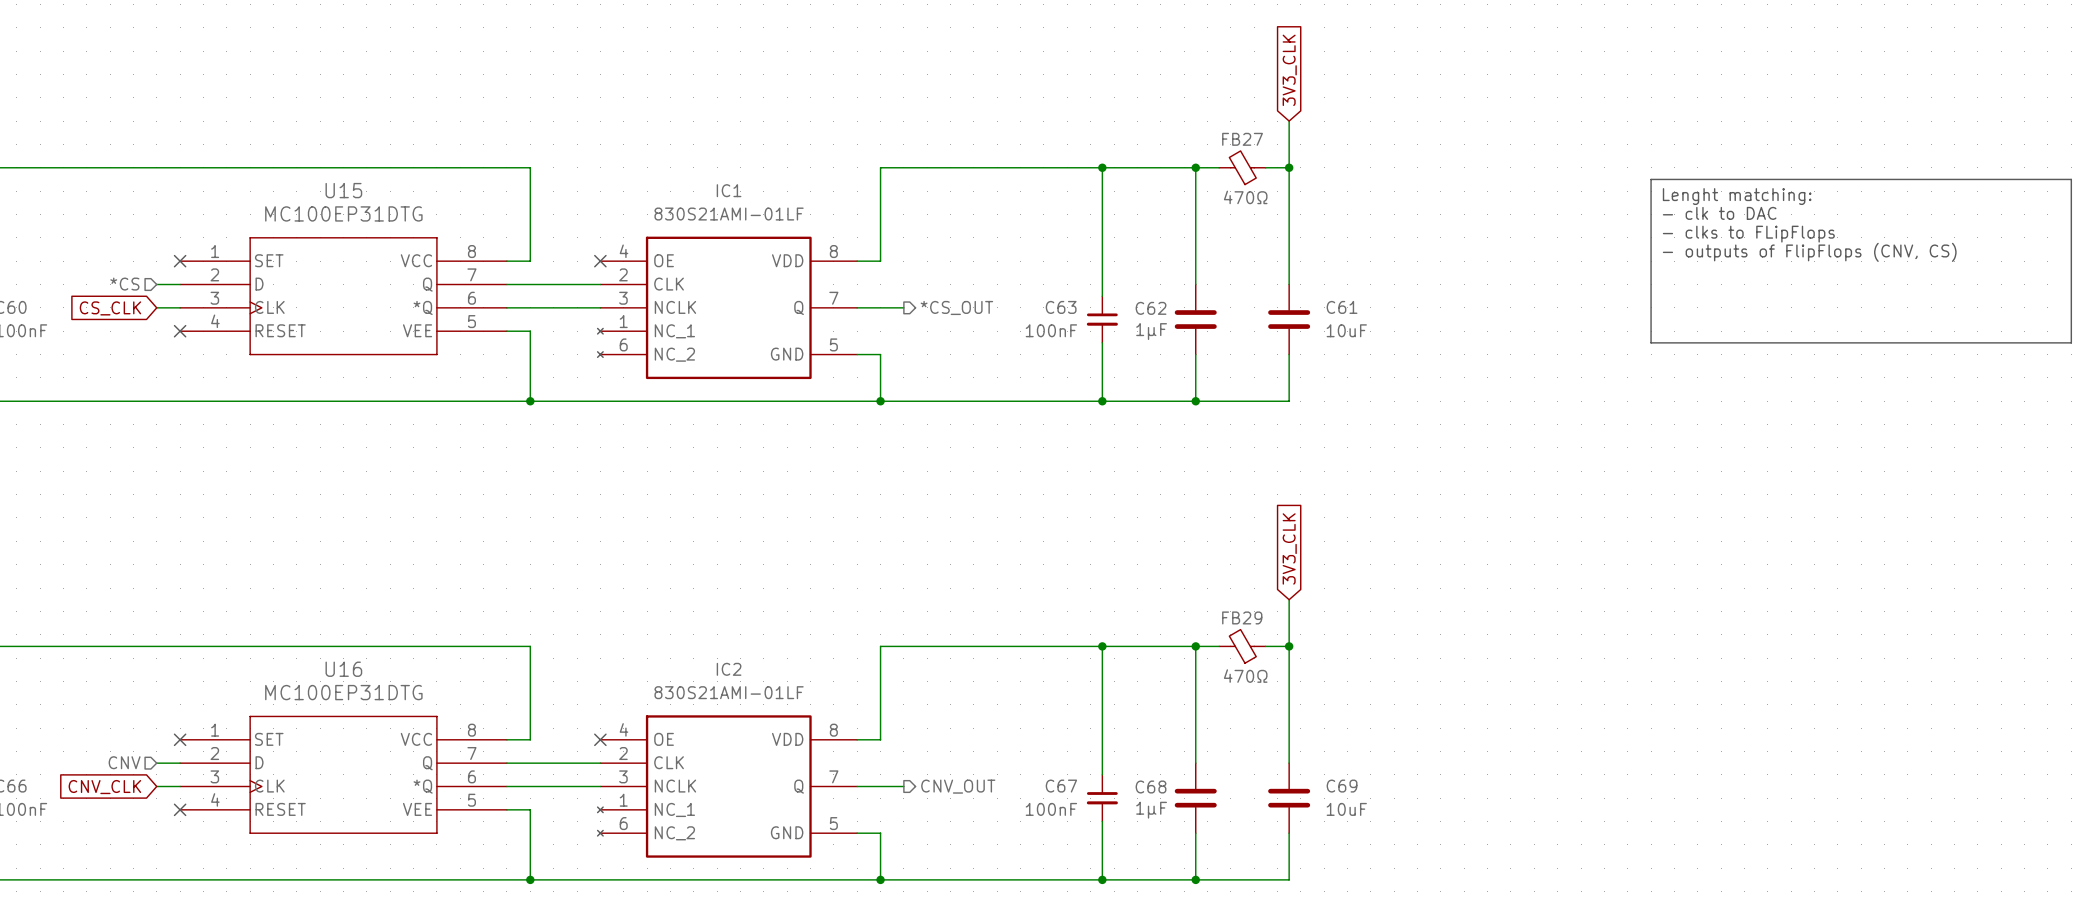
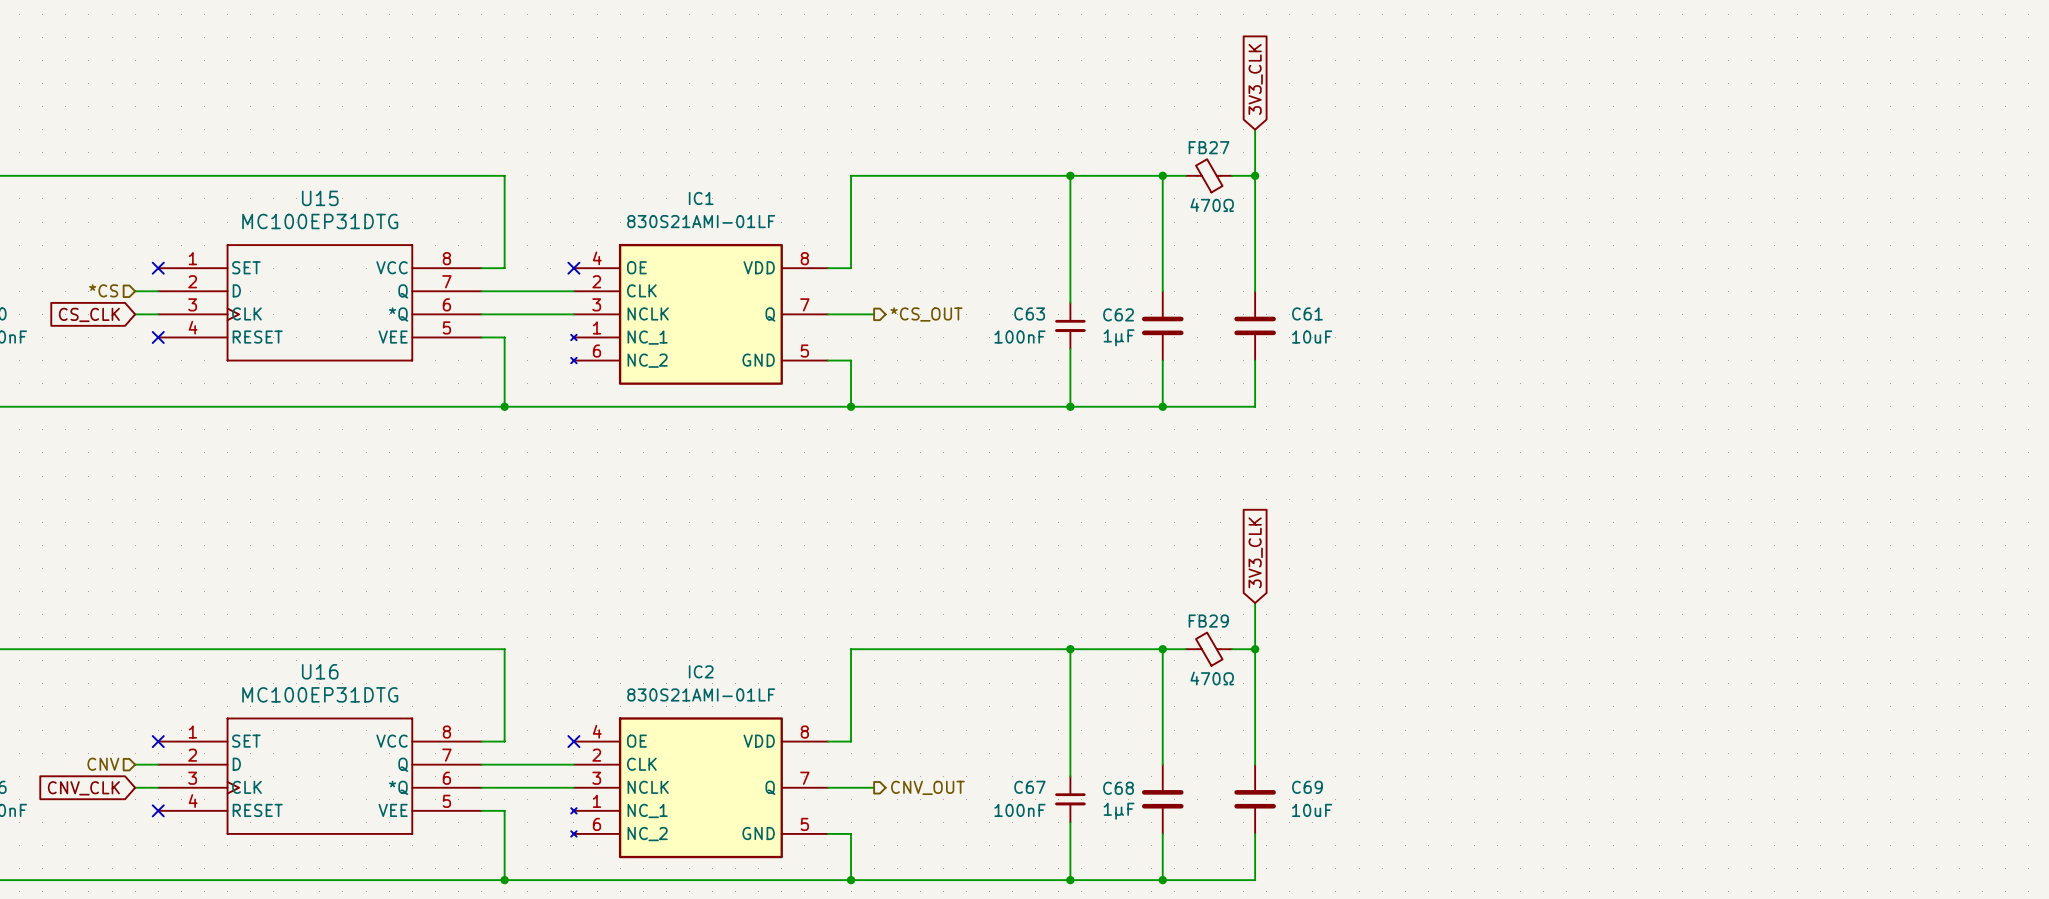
line: (1651, 179) (2071, 179) (2071, 342) (1651, 342) (1651, 179) -> none
text: Lenght matching: (1737, 196) -> none
text: - clk to DAC (1719, 213) -> none
text: - clks to FLipFlops (1748, 234) -> none
text: - outputs of FlipFlops (CNV, CS) (1809, 252) -> none

